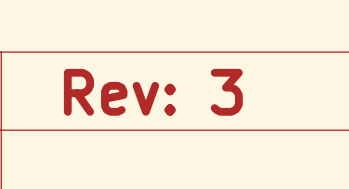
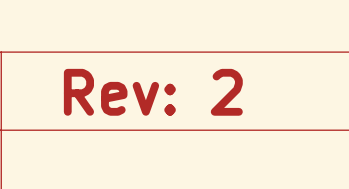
title block: Rev: 3 (153, 92) -> Rev: 2 (153, 92)

